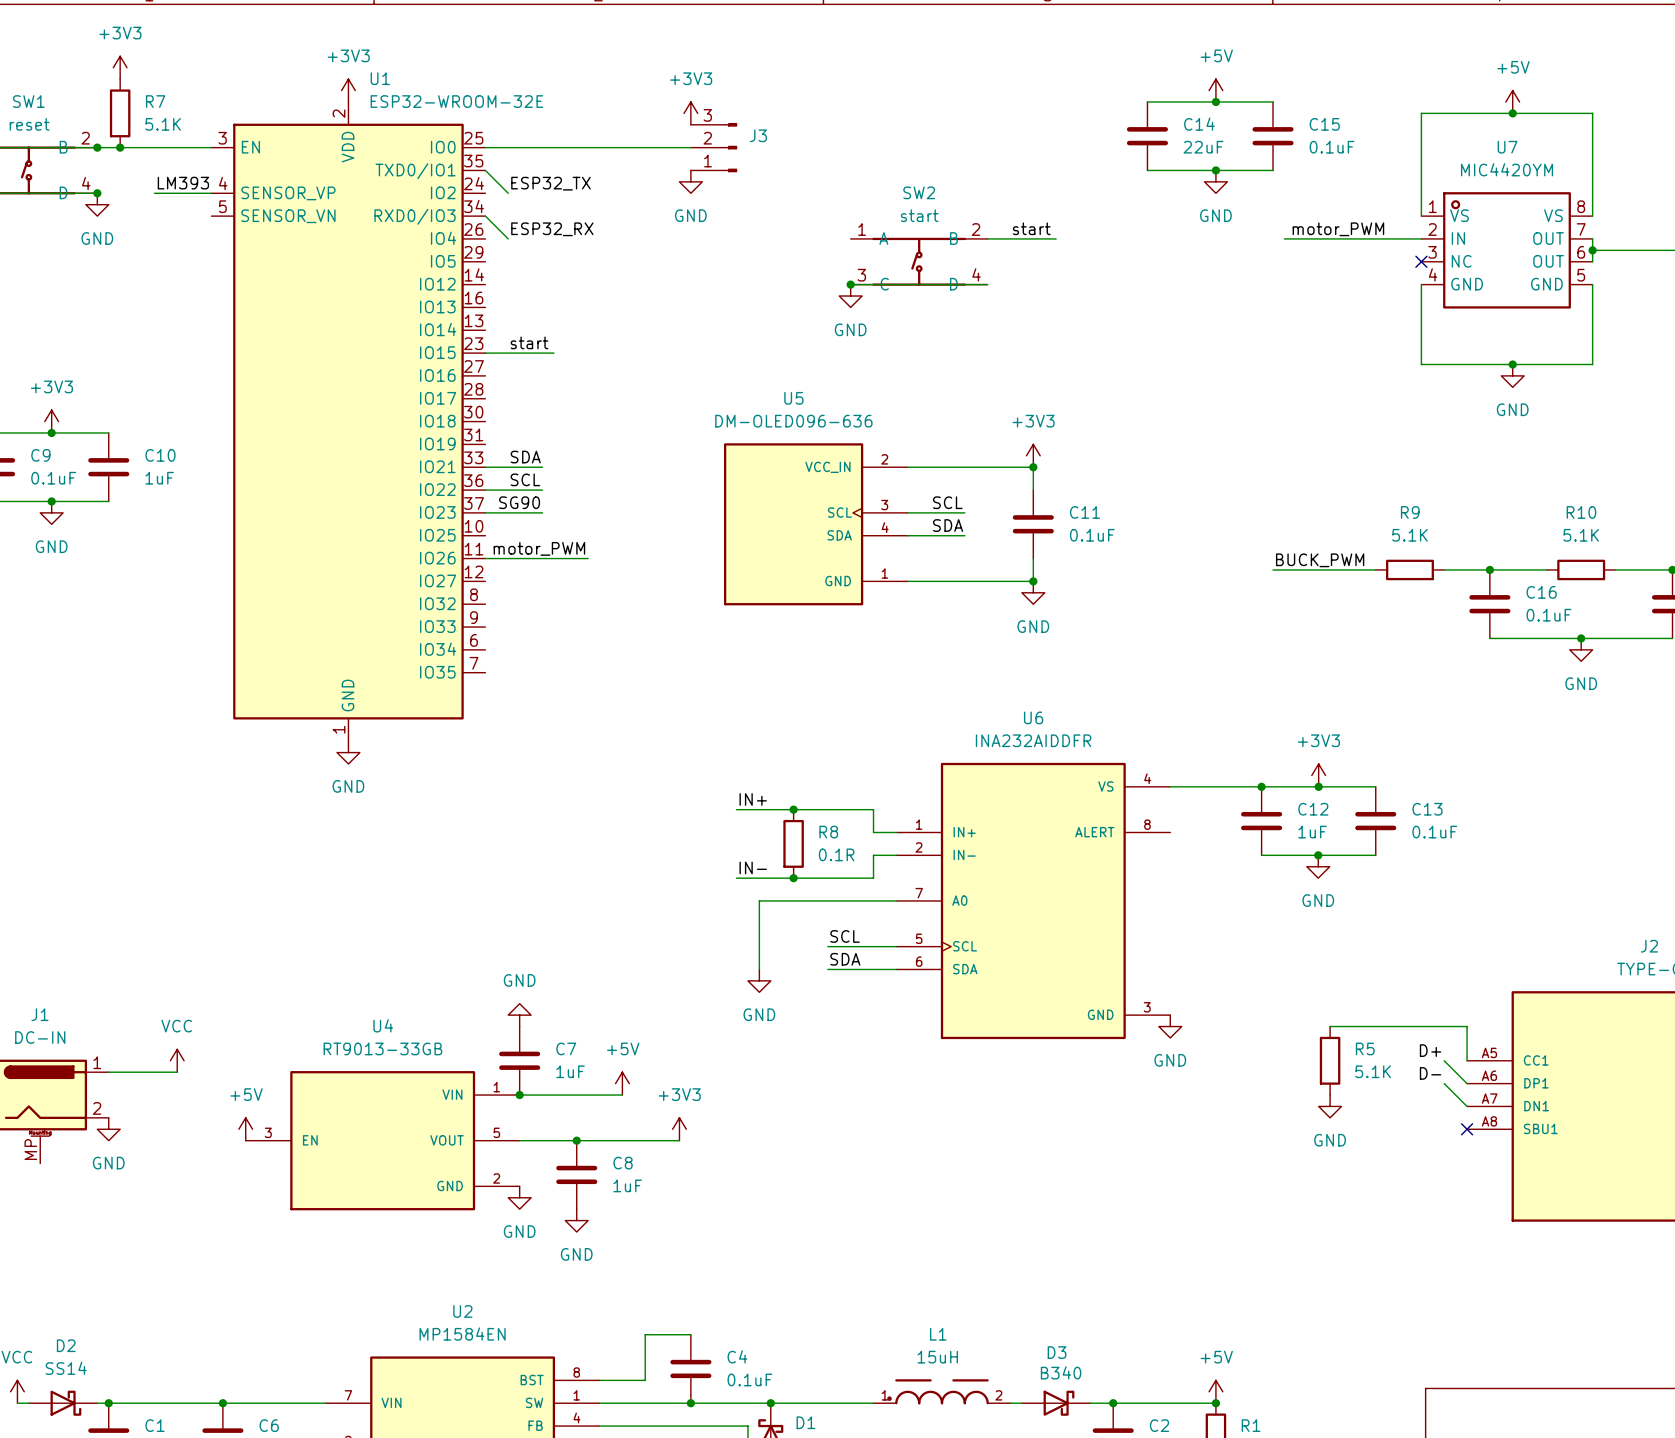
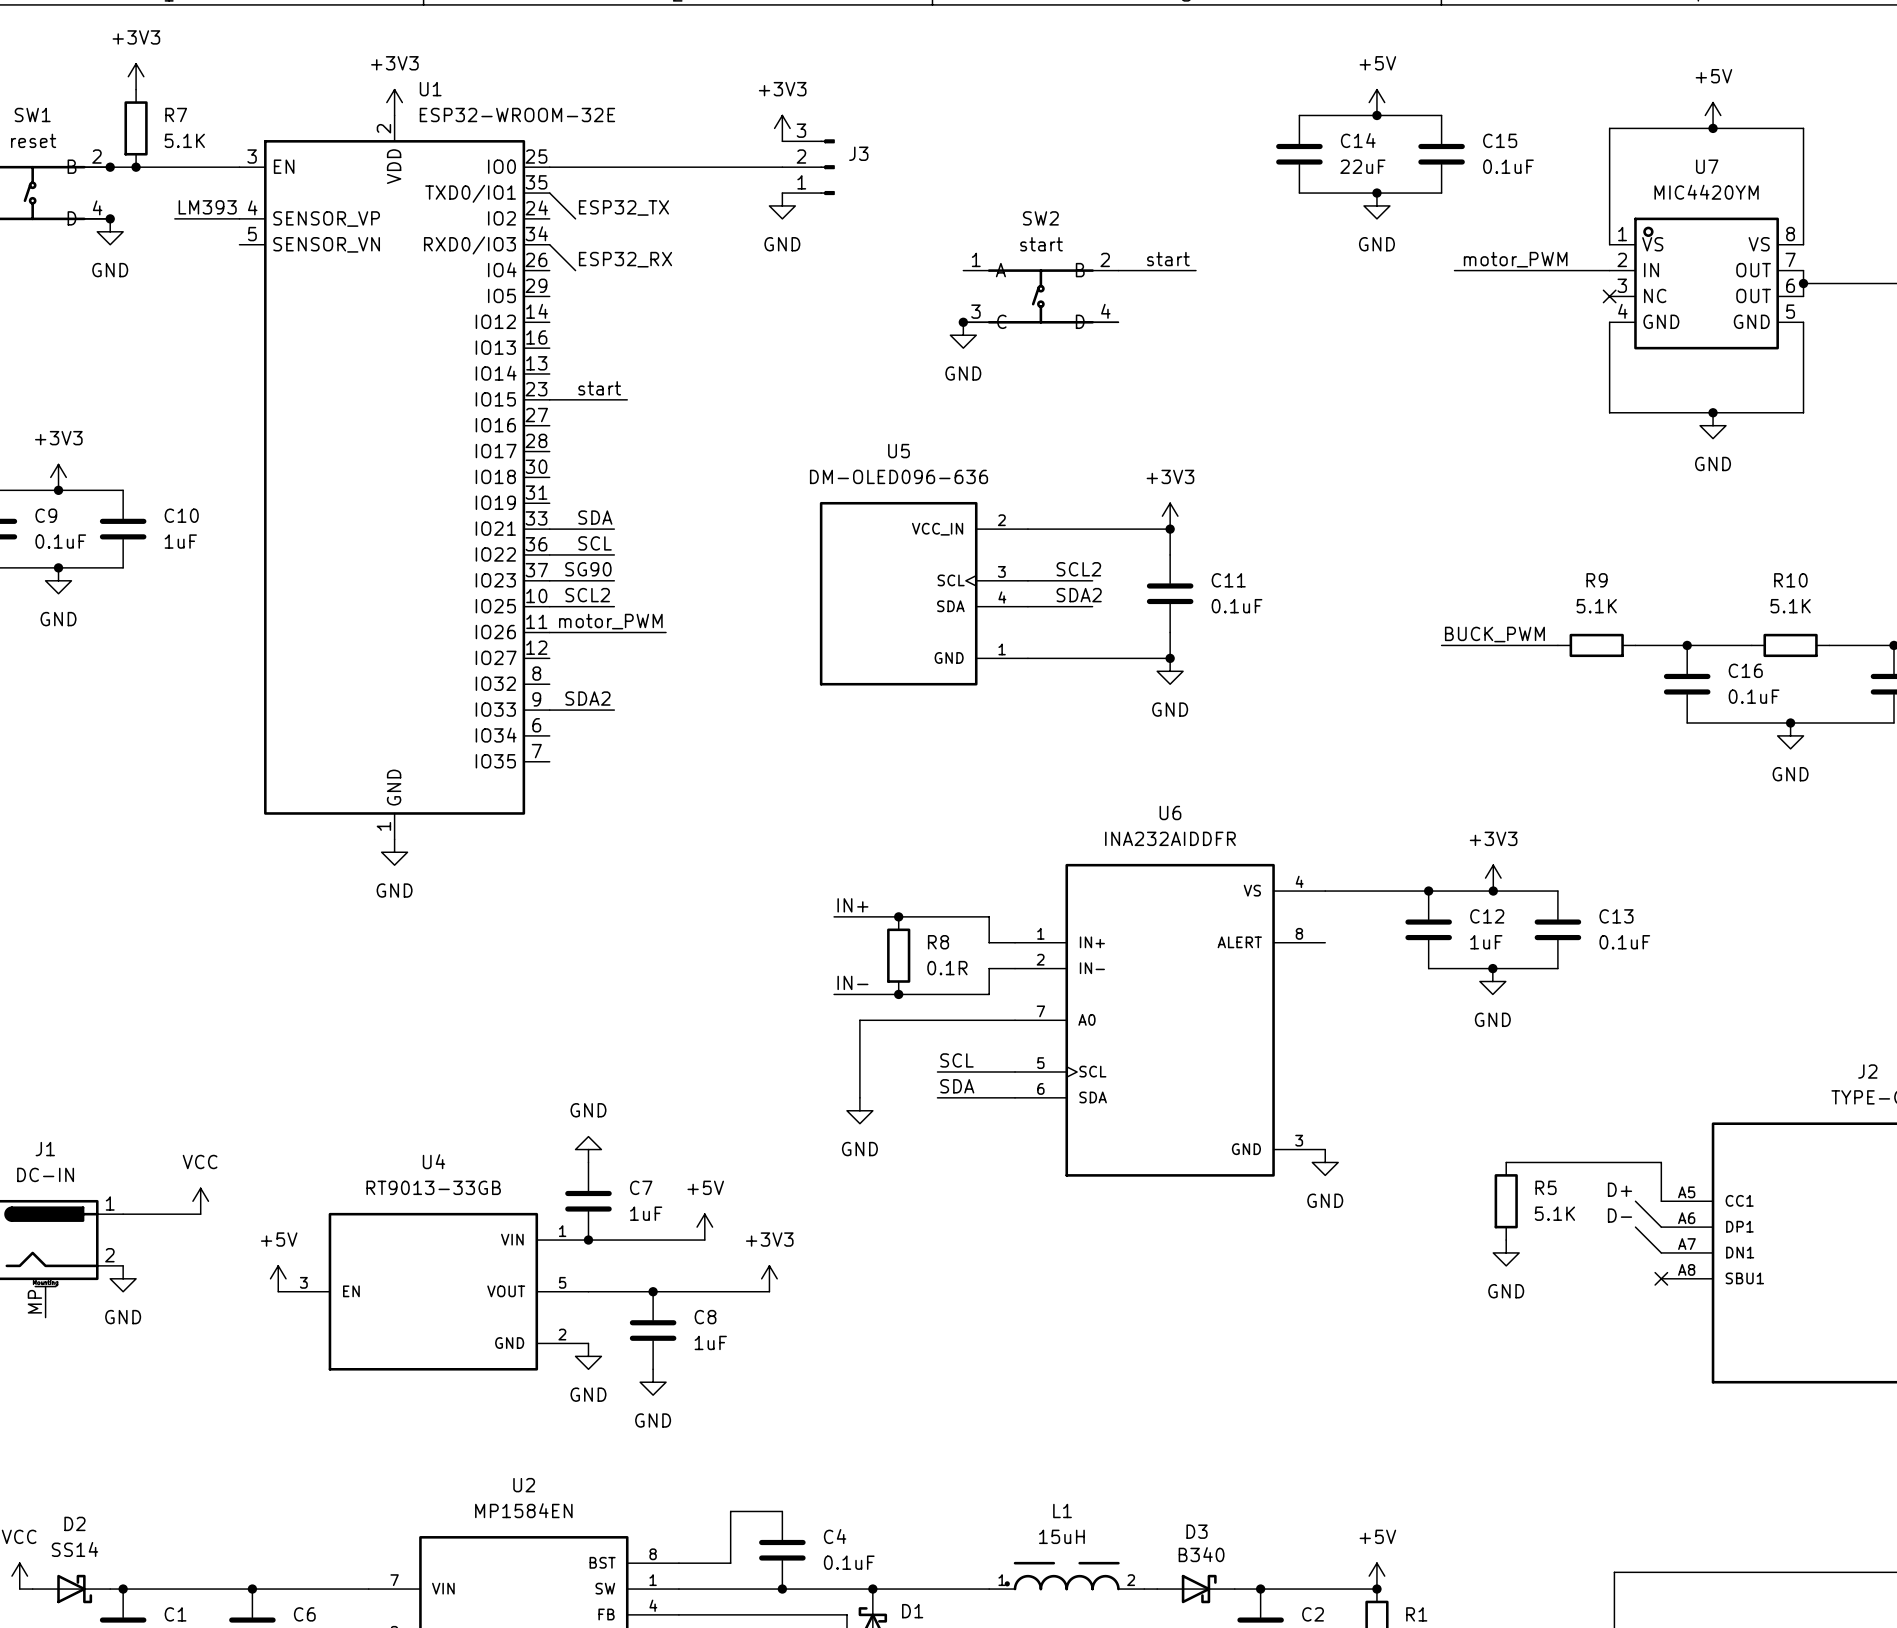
label: SCL (947, 502) -> SCL2 (1078, 569)
label: none -> SCL2 (587, 595)
label: SDA (948, 525) -> SDA2 (1079, 595)
wire: none -> (549, 606) (614, 606)
label: none -> SDA2 (587, 698)
wire: none -> (549, 710) (614, 710)

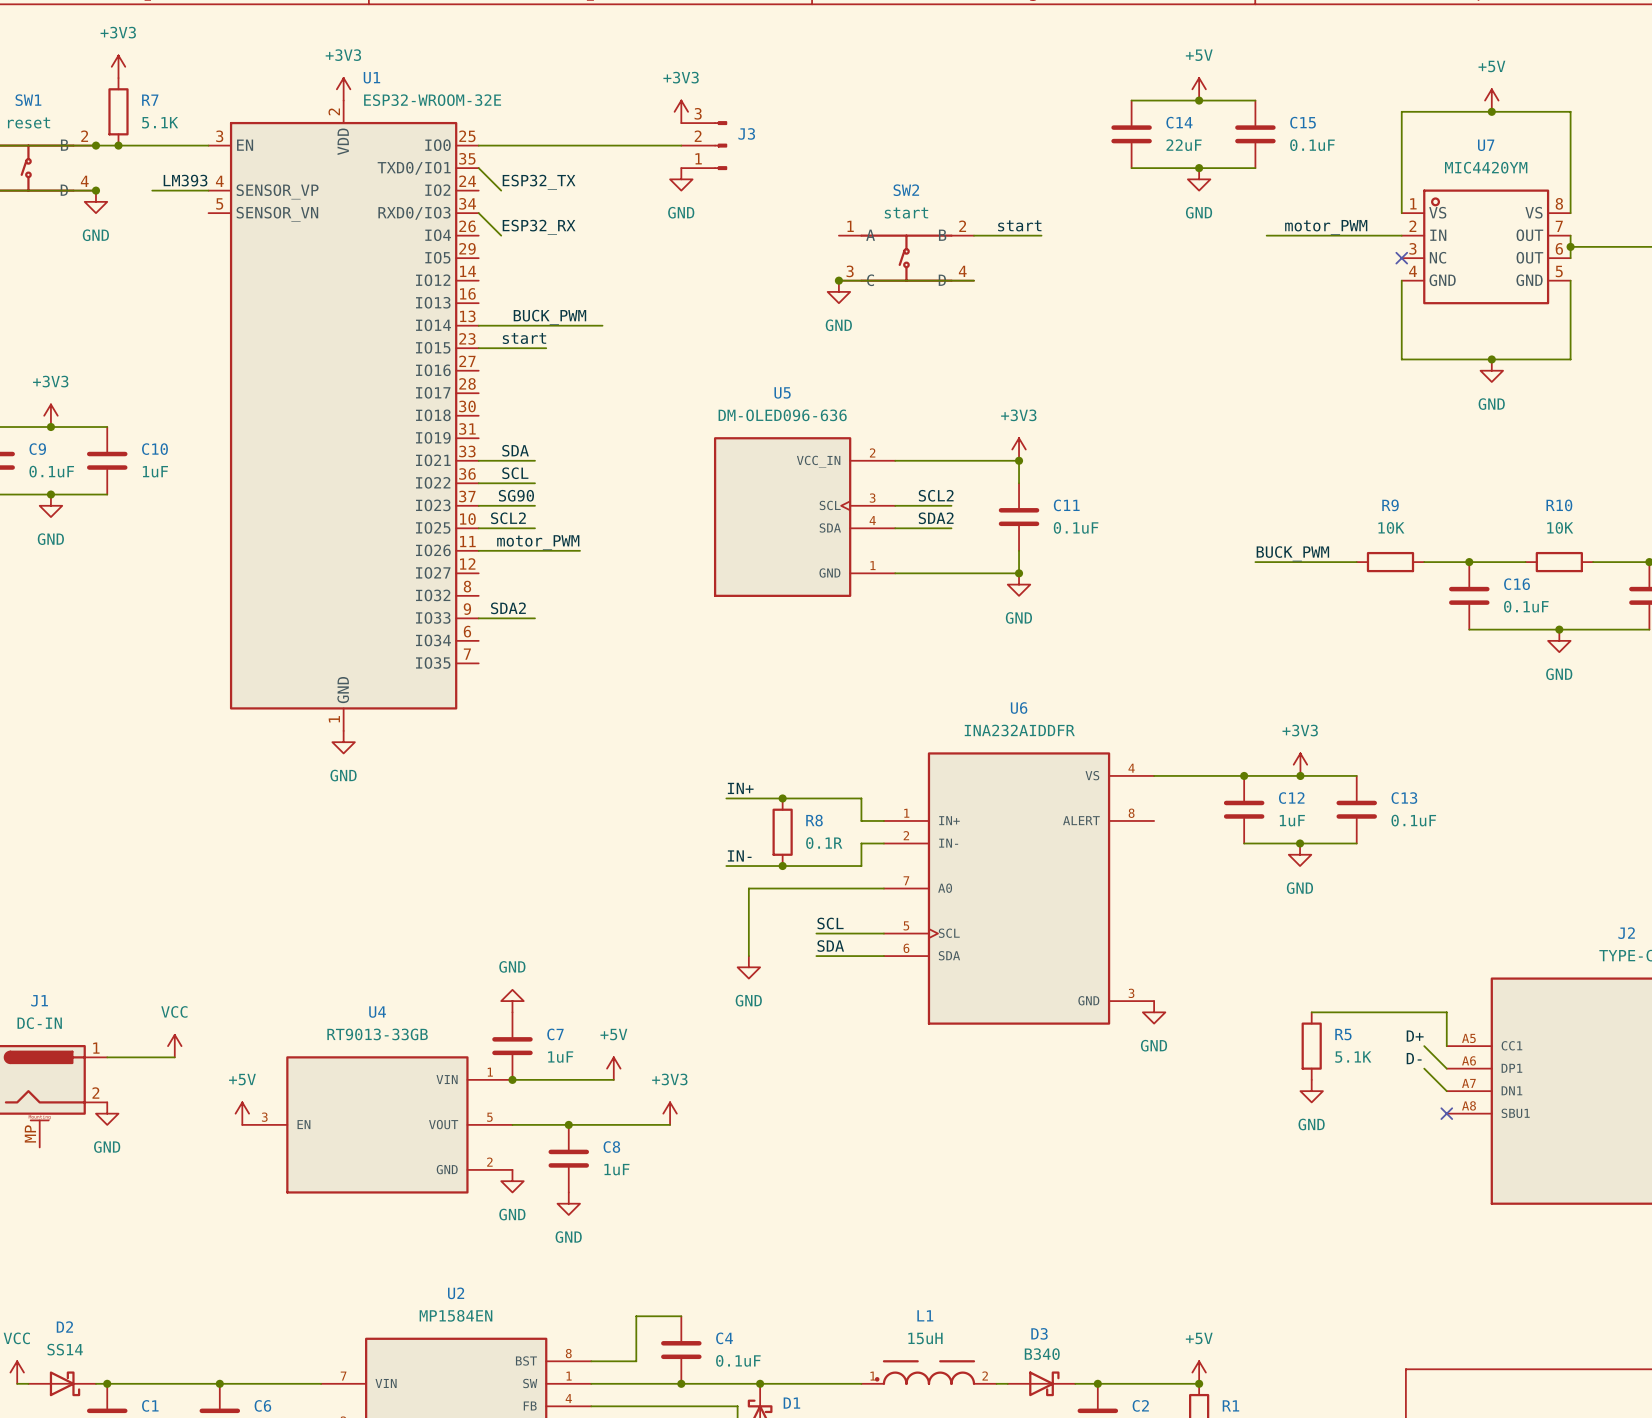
label: none -> BUCK_PWM (549, 317)
wire: none -> (478, 325) (602, 325)
R9 value: 5.1K (1596, 606) -> 10K (1391, 527)
R10 value: 5.1K (1790, 606) -> 10K (1560, 527)

